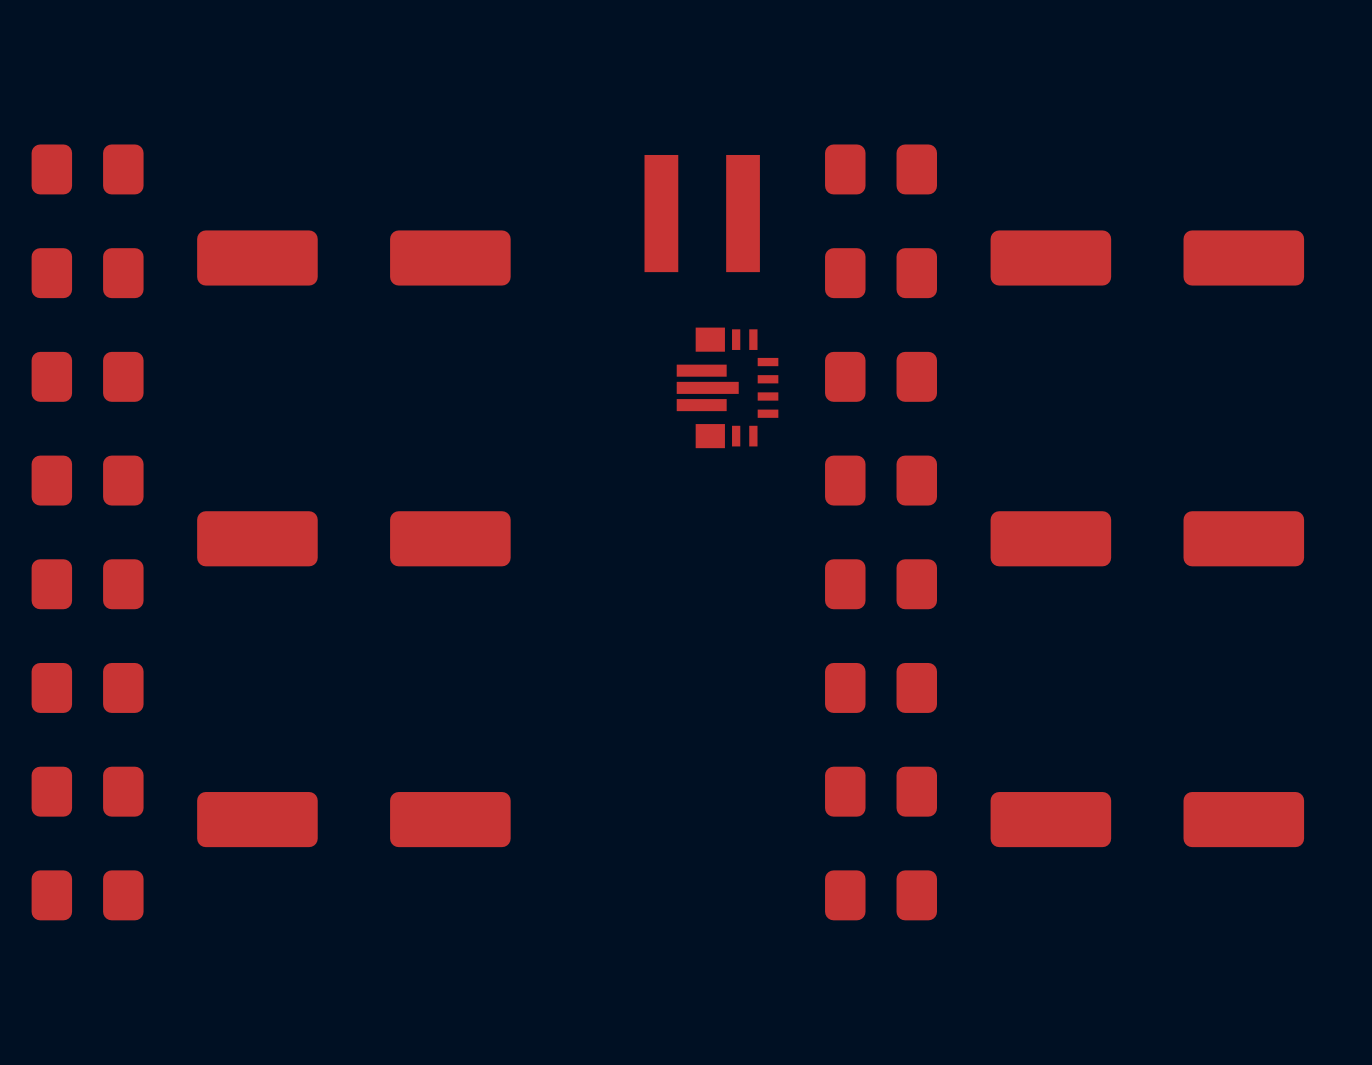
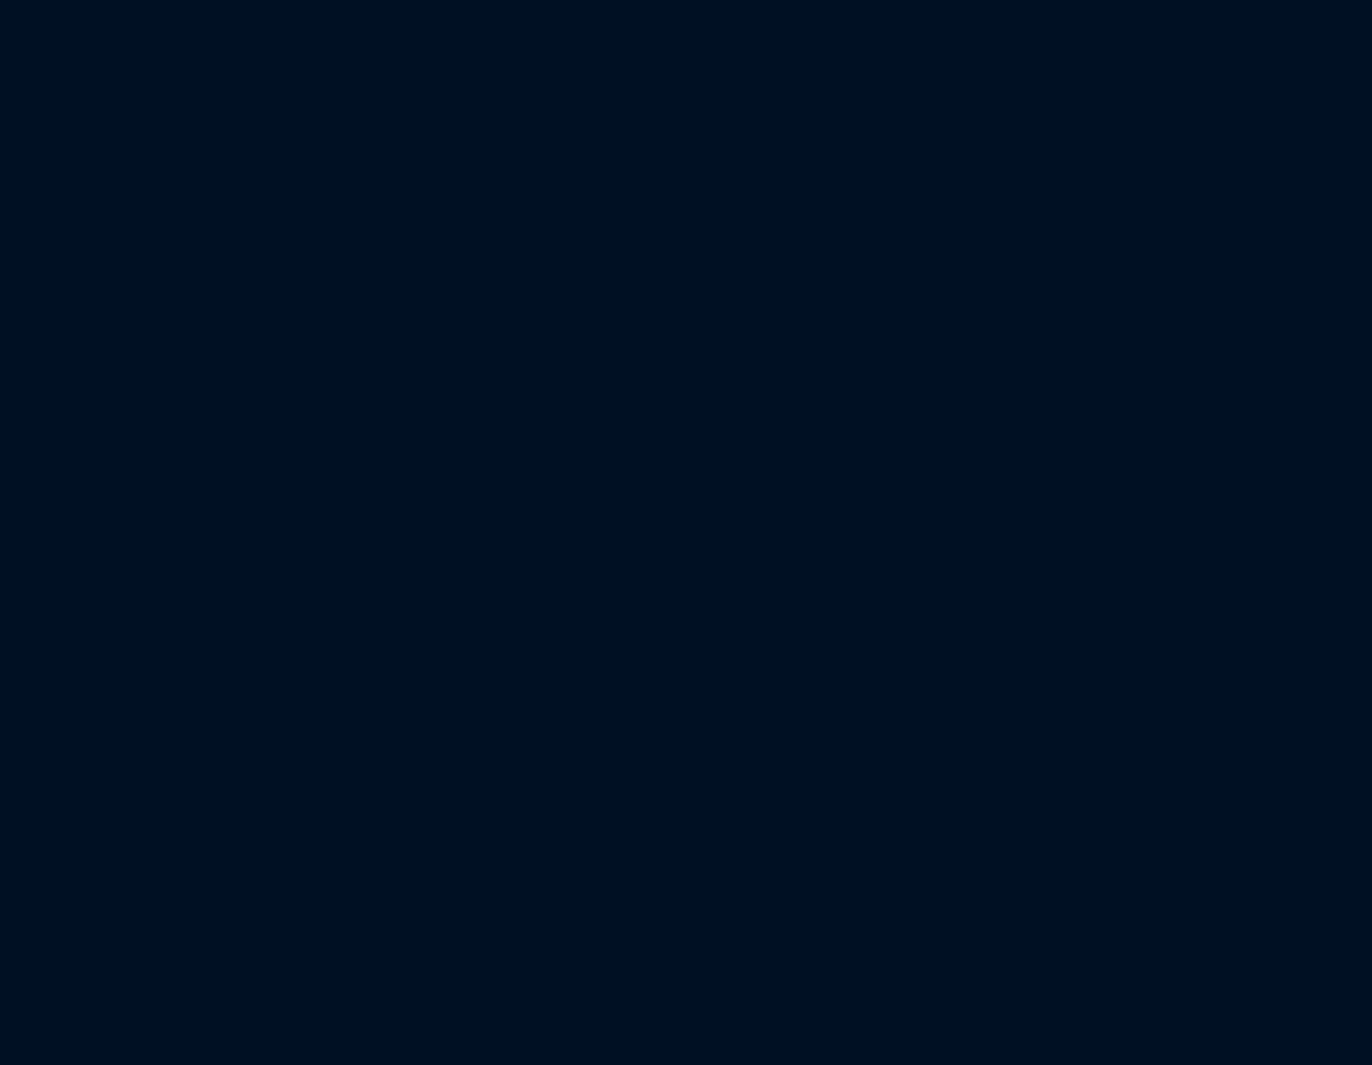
part: (87, 169) -> none
part: (881, 169) -> none
part: (702, 213) -> none
part: (353, 257) -> none
part: (1147, 257) -> none
part: (87, 273) -> none
part: (881, 273) -> none
part: (87, 376) -> none
part: (881, 376) -> none
part: (727, 387) -> none
part: (87, 480) -> none
part: (881, 480) -> none
part: (353, 538) -> none
part: (1147, 538) -> none
part: (87, 584) -> none
part: (881, 584) -> none
part: (87, 687) -> none
part: (881, 687) -> none
part: (87, 791) -> none
part: (881, 791) -> none
part: (353, 819) -> none
part: (1147, 819) -> none
part: (87, 895) -> none
part: (881, 895) -> none

